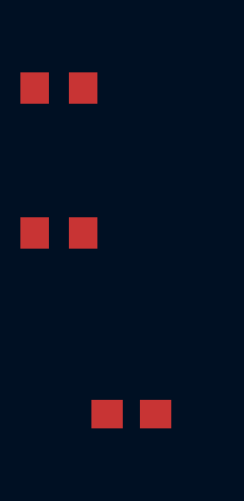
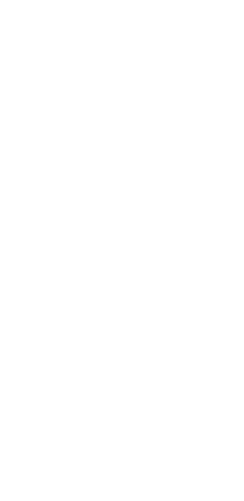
part: (58, 88) -> none
part: (58, 232) -> none
part: (131, 414) -> none

